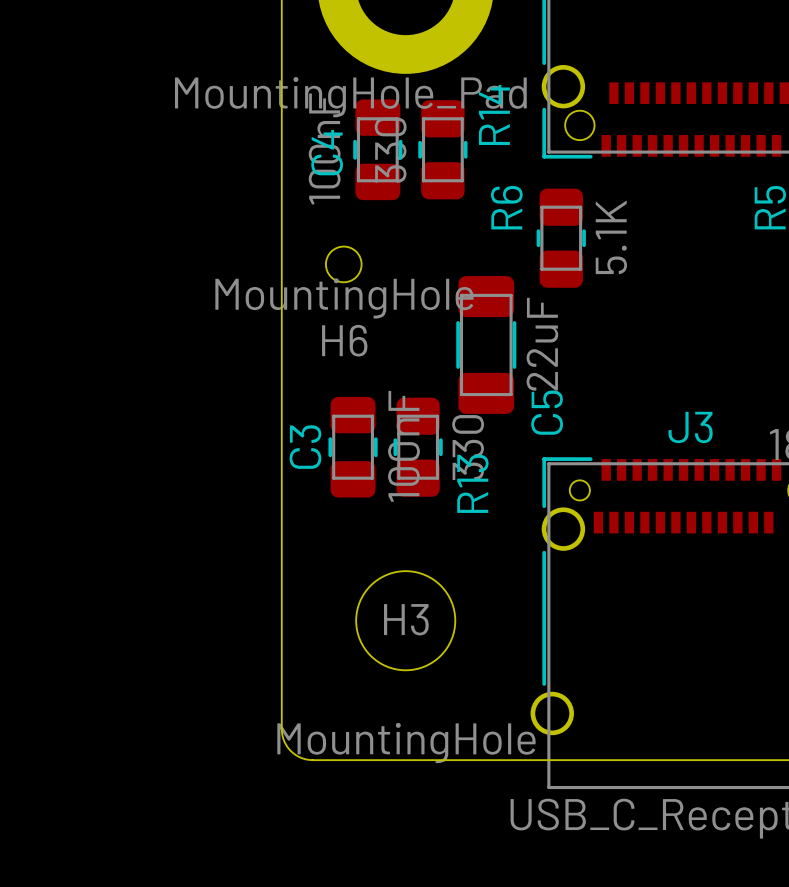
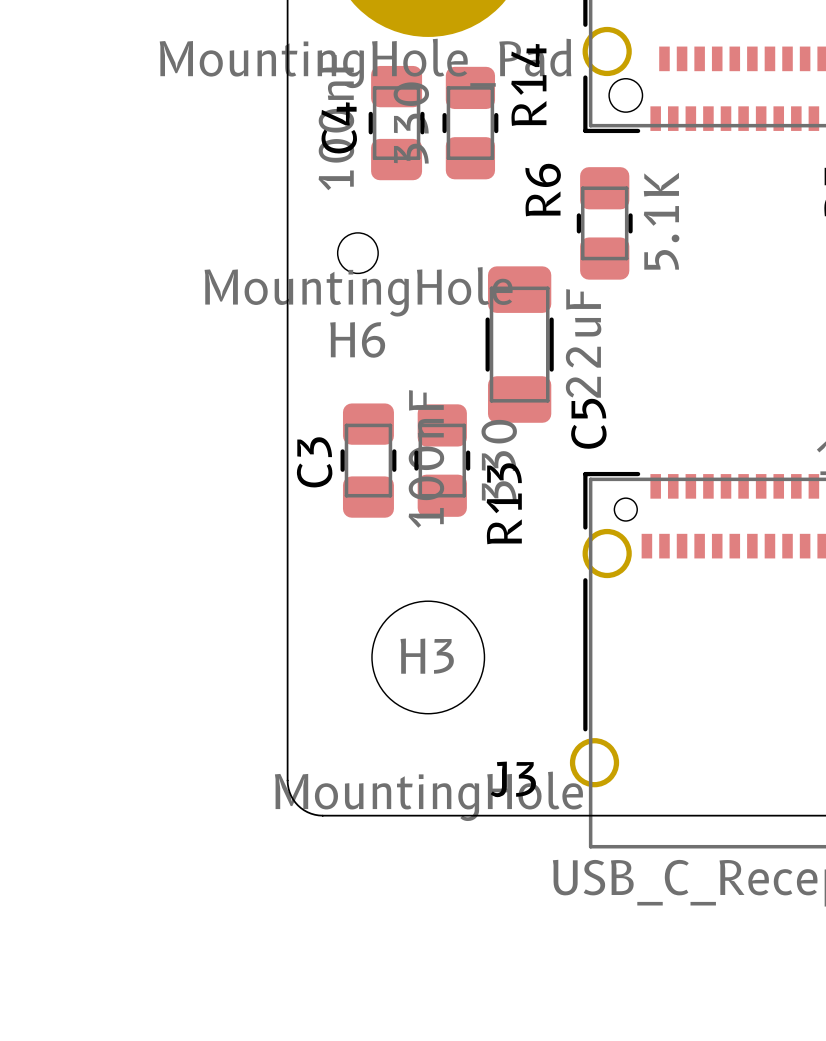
J3 name position: J3 (690, 427) -> J3 (513, 779)

